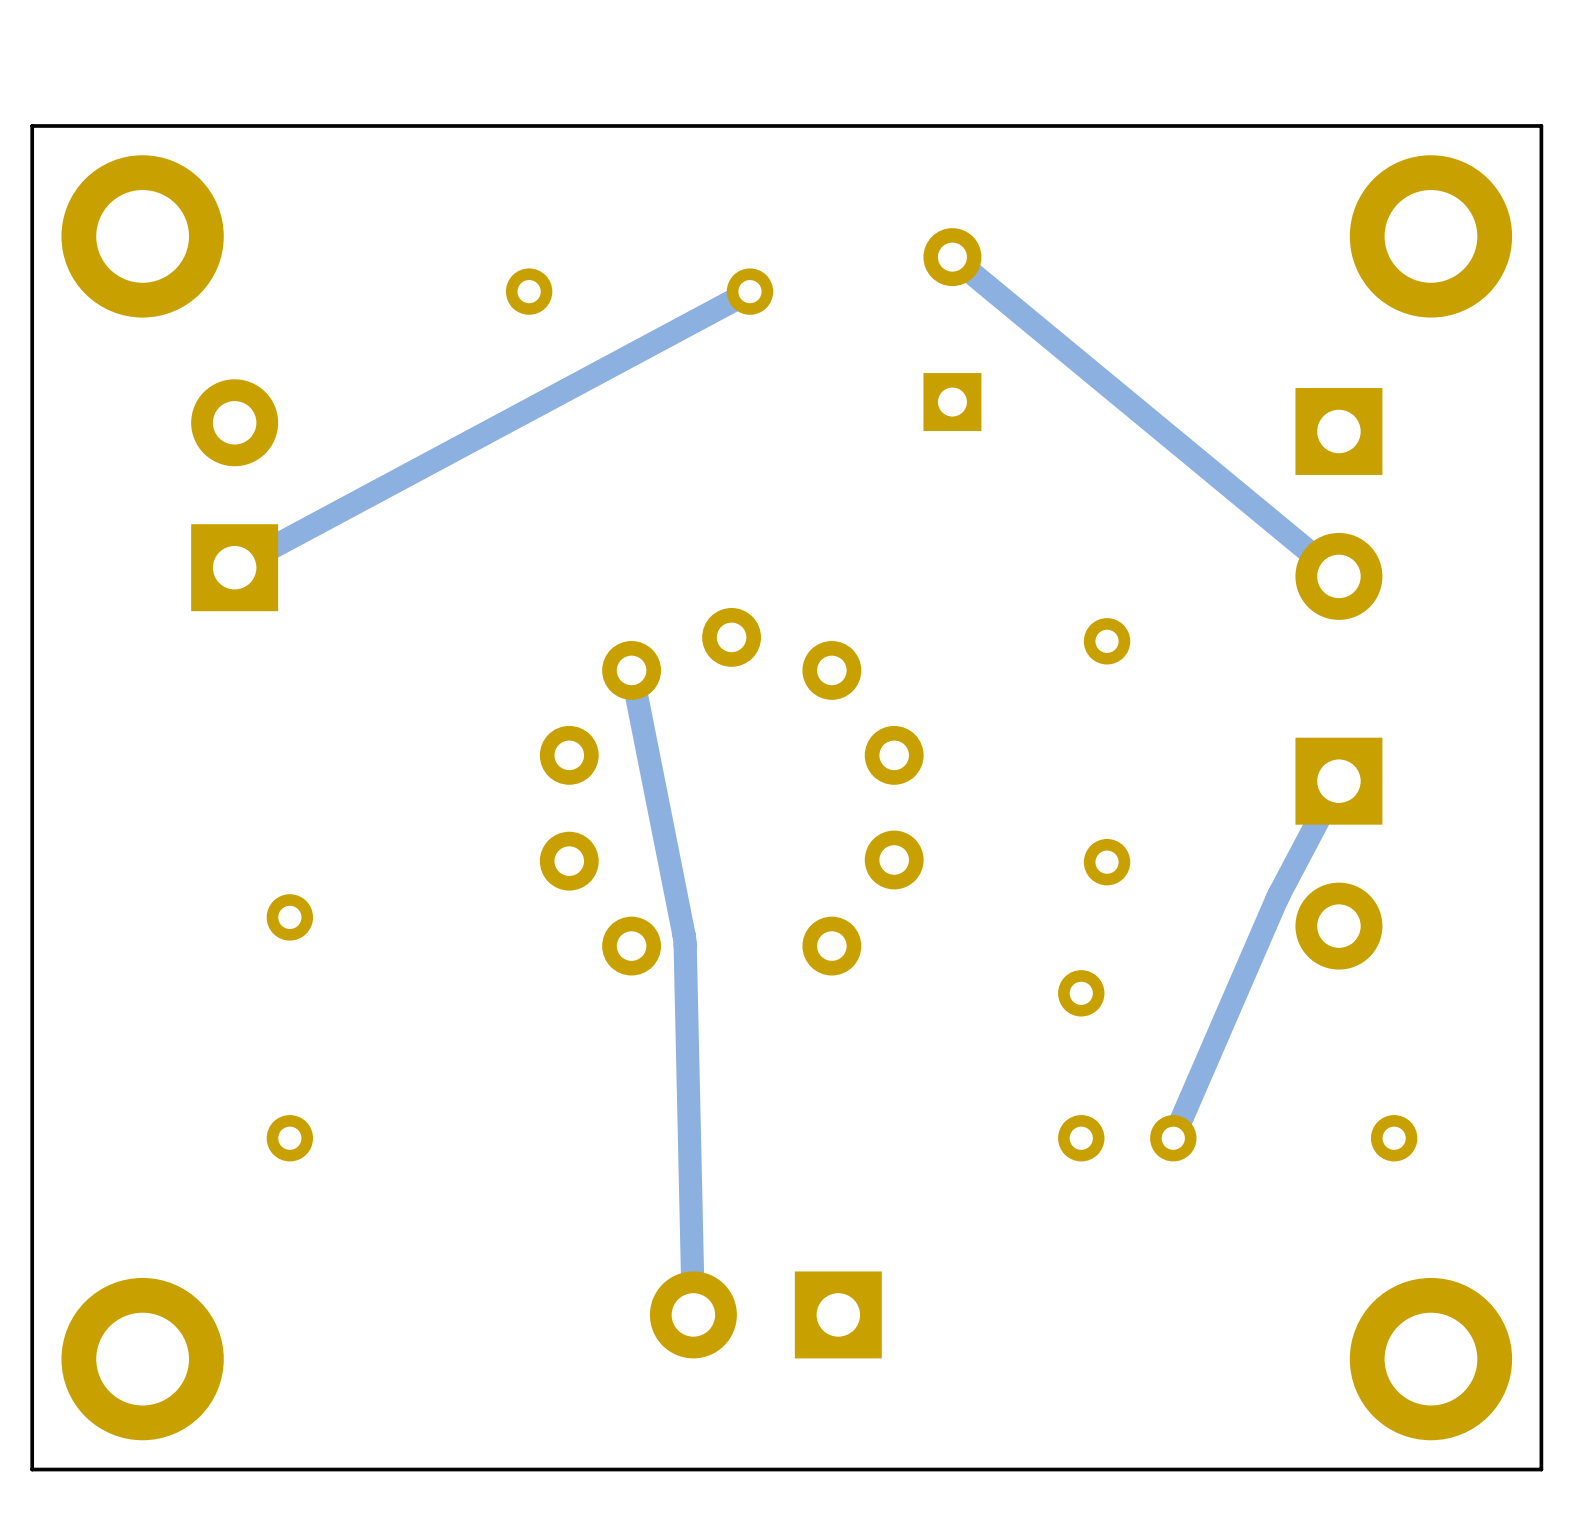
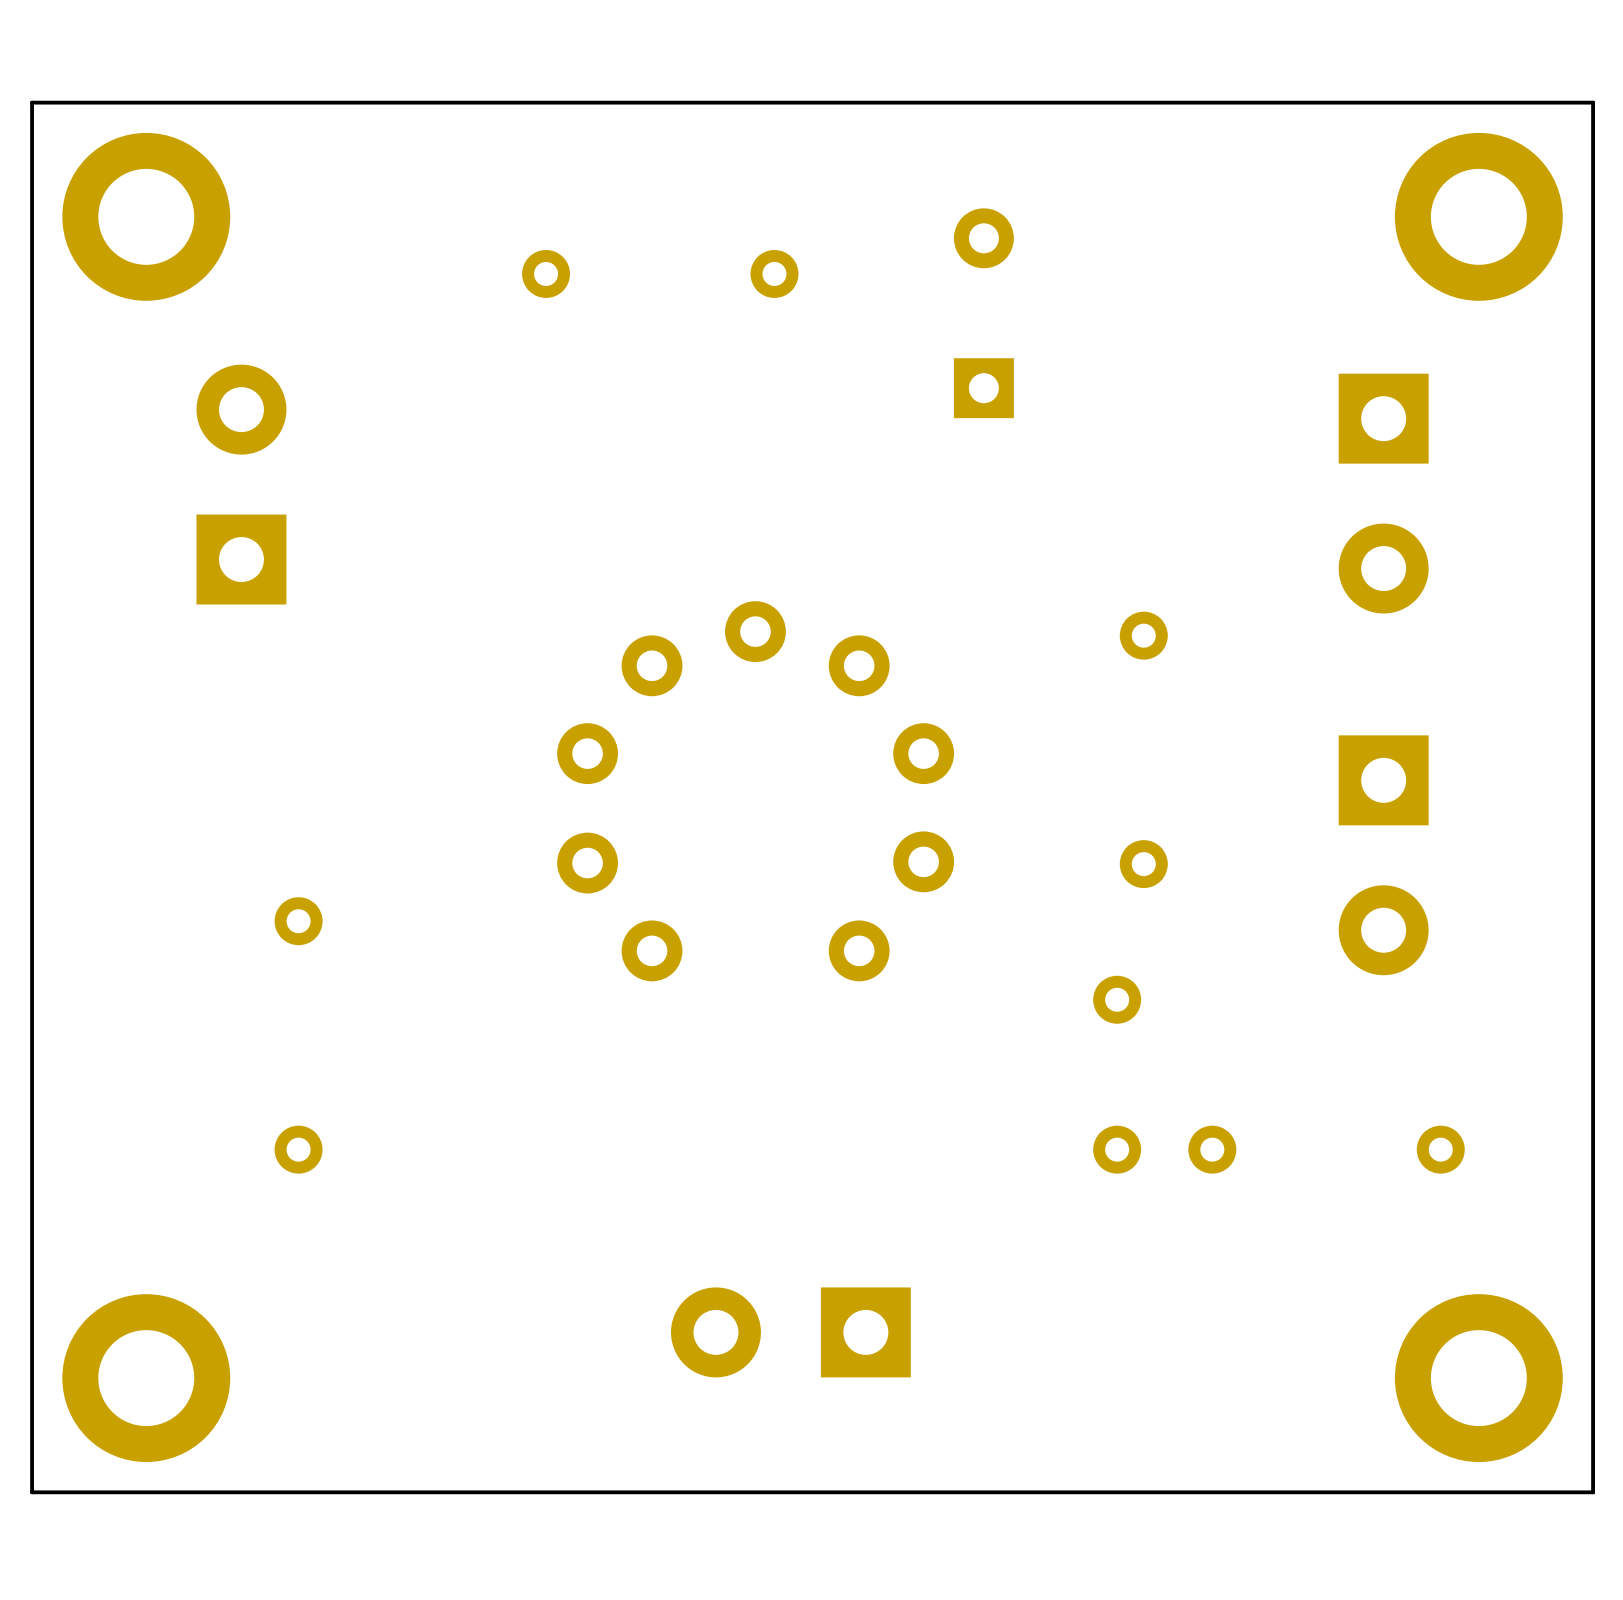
track: (952, 257) (1338, 576) -> none
track: (749, 291) (234, 567) -> none
track: (631, 670) (684, 940) (693, 1314) -> none
track: (1338, 781) (1276, 899) (1173, 1138) -> none

